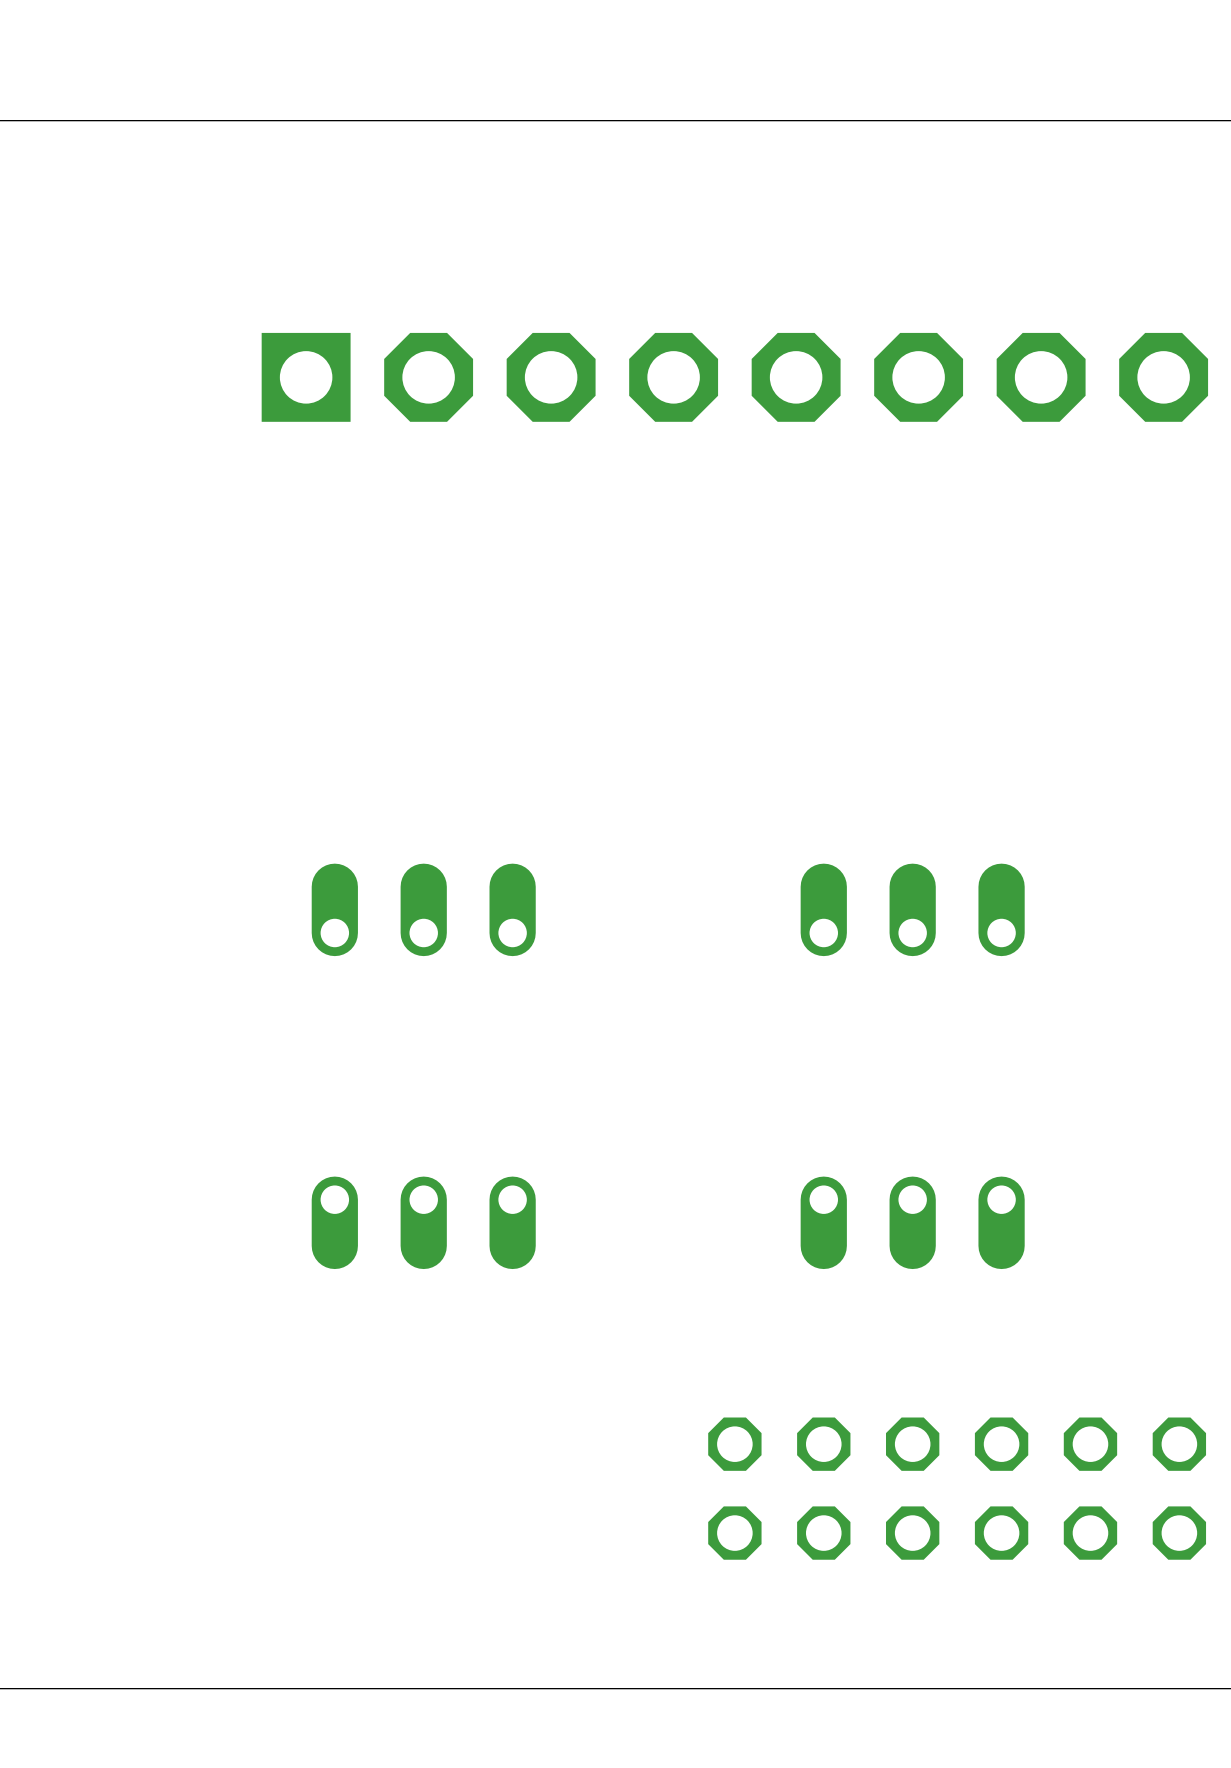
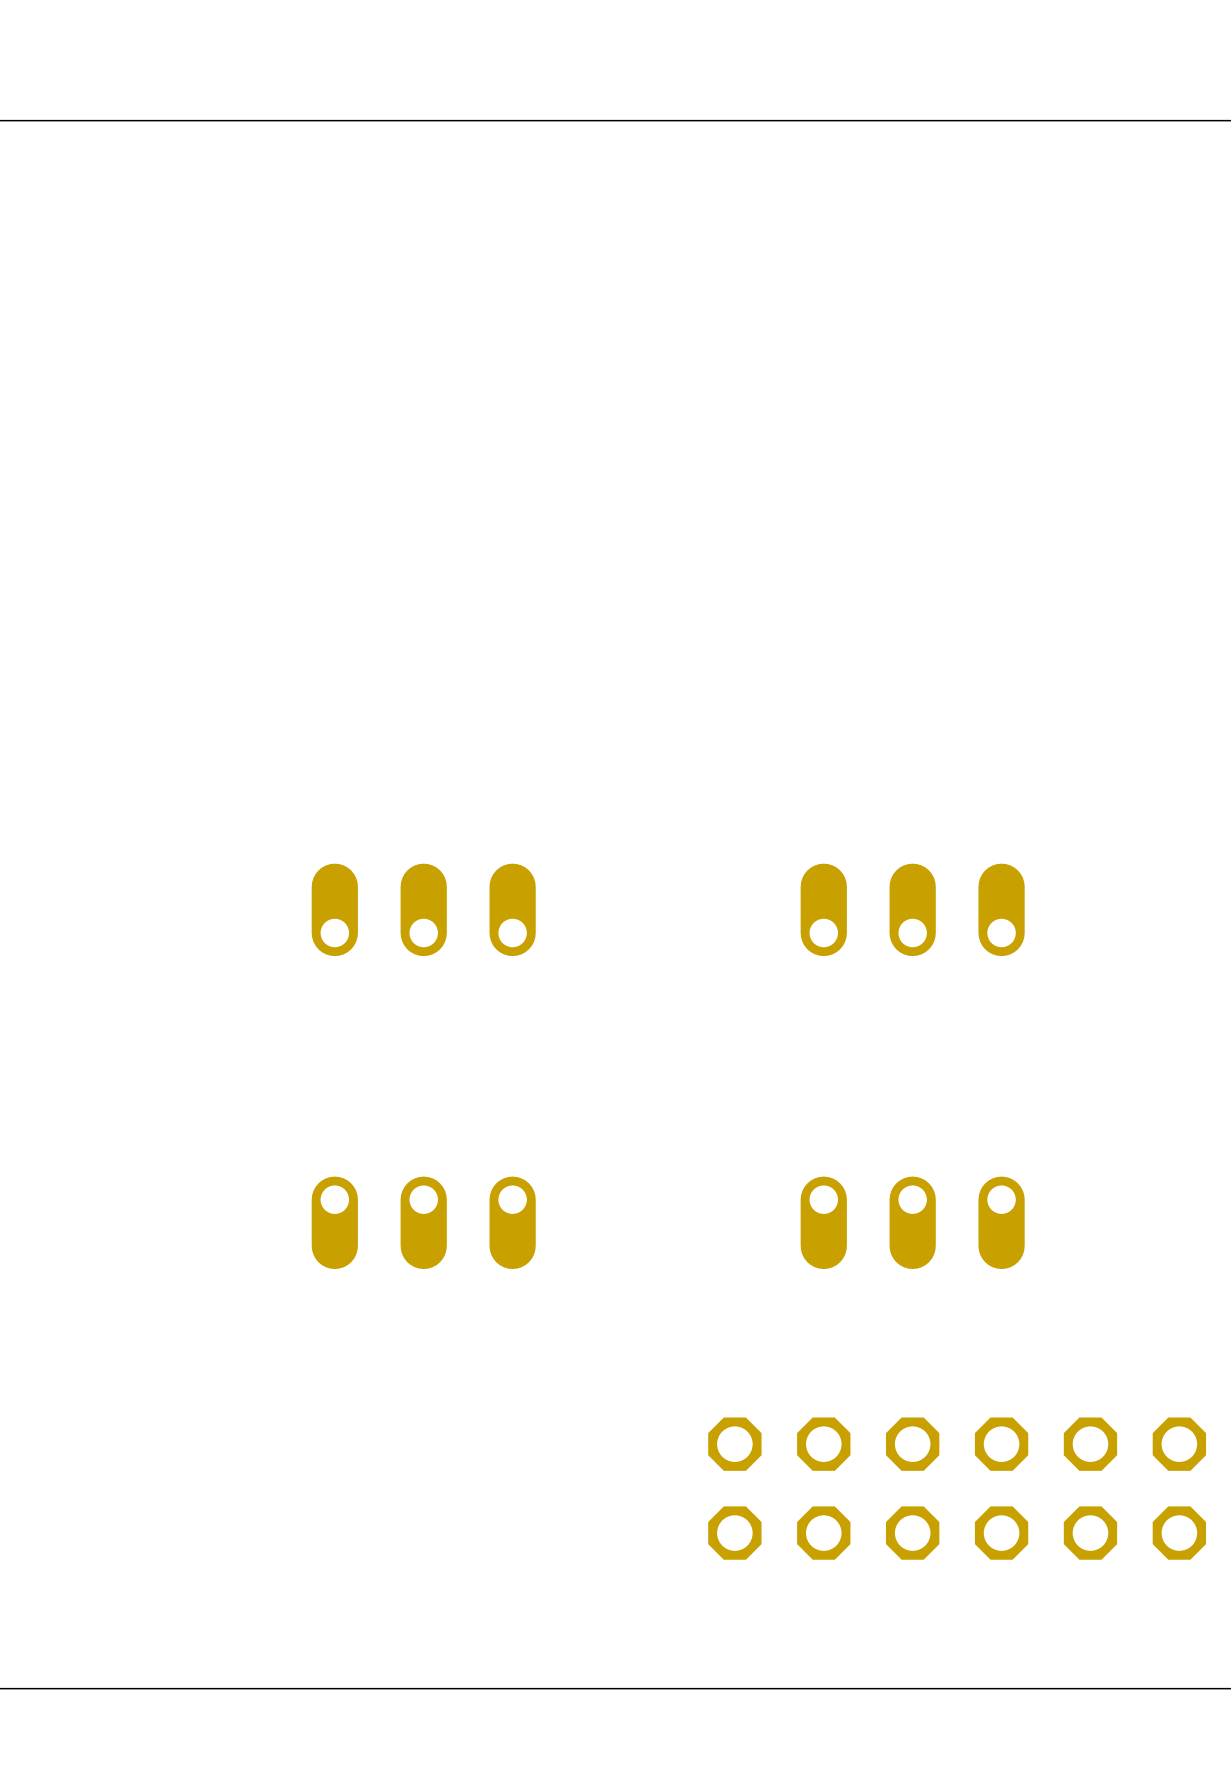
part: (734, 377) -> none

